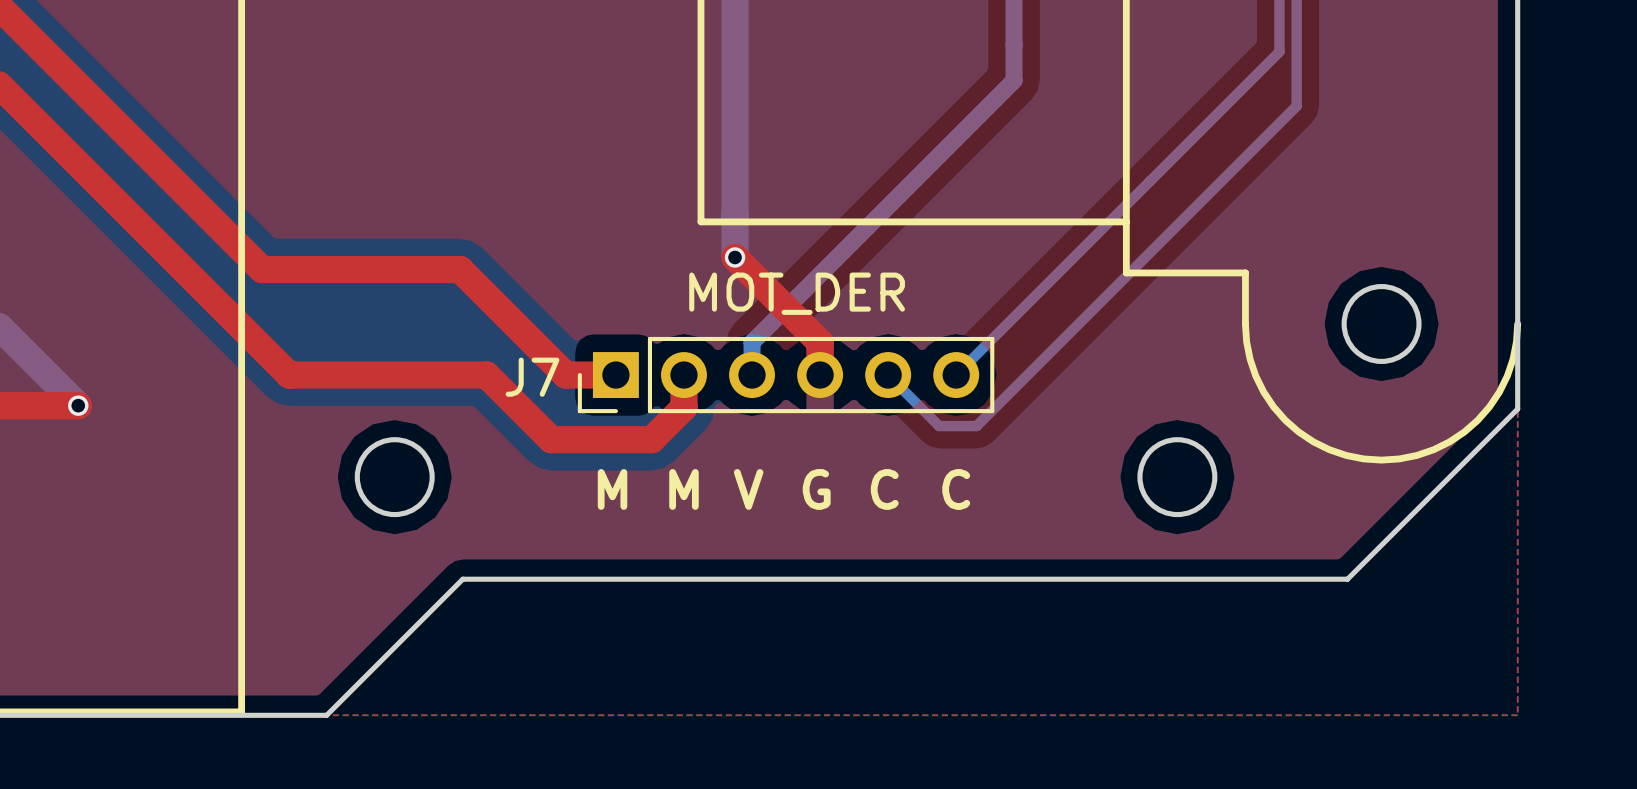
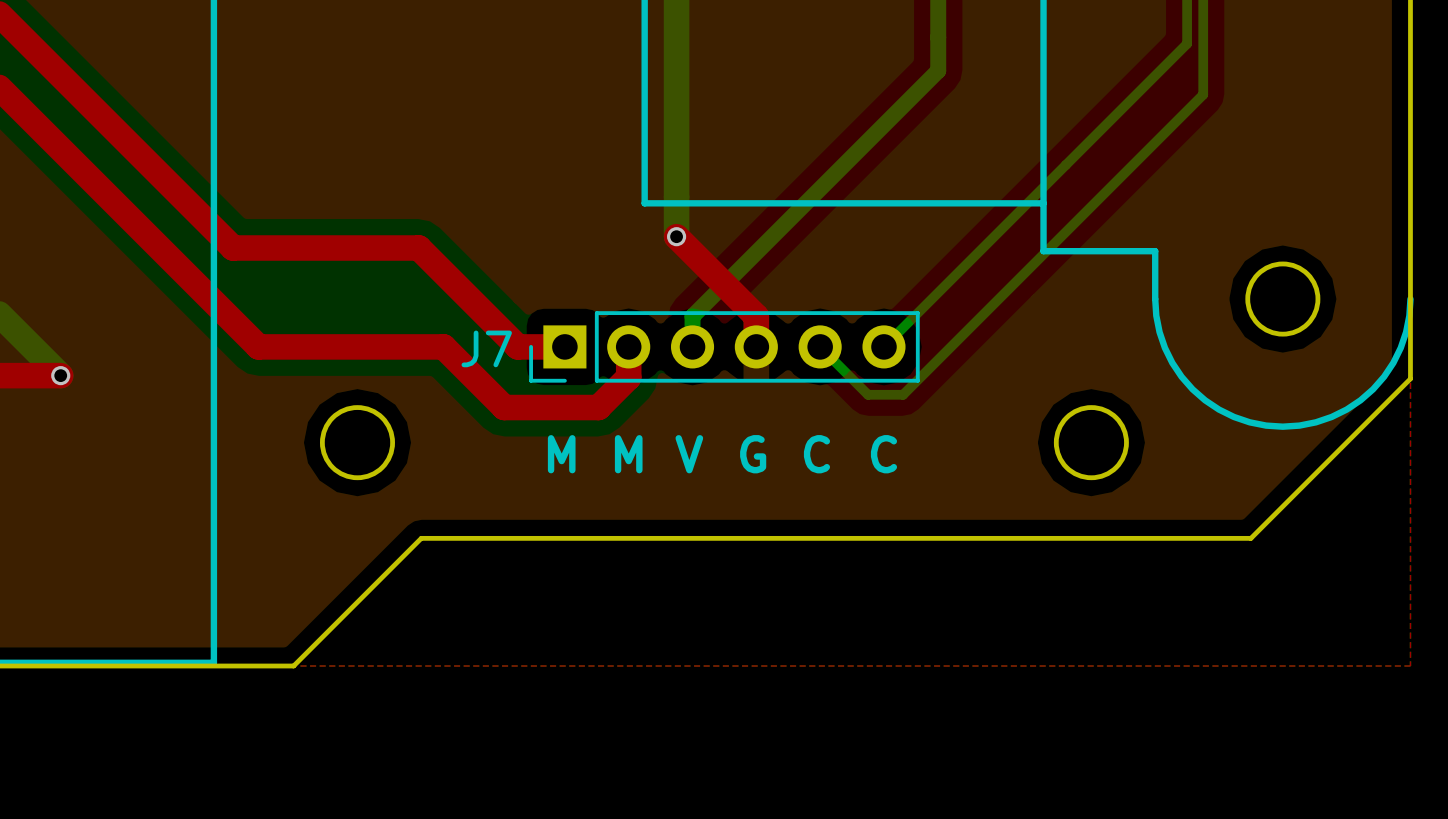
J7 value: MOT_DER (797, 293) -> none

